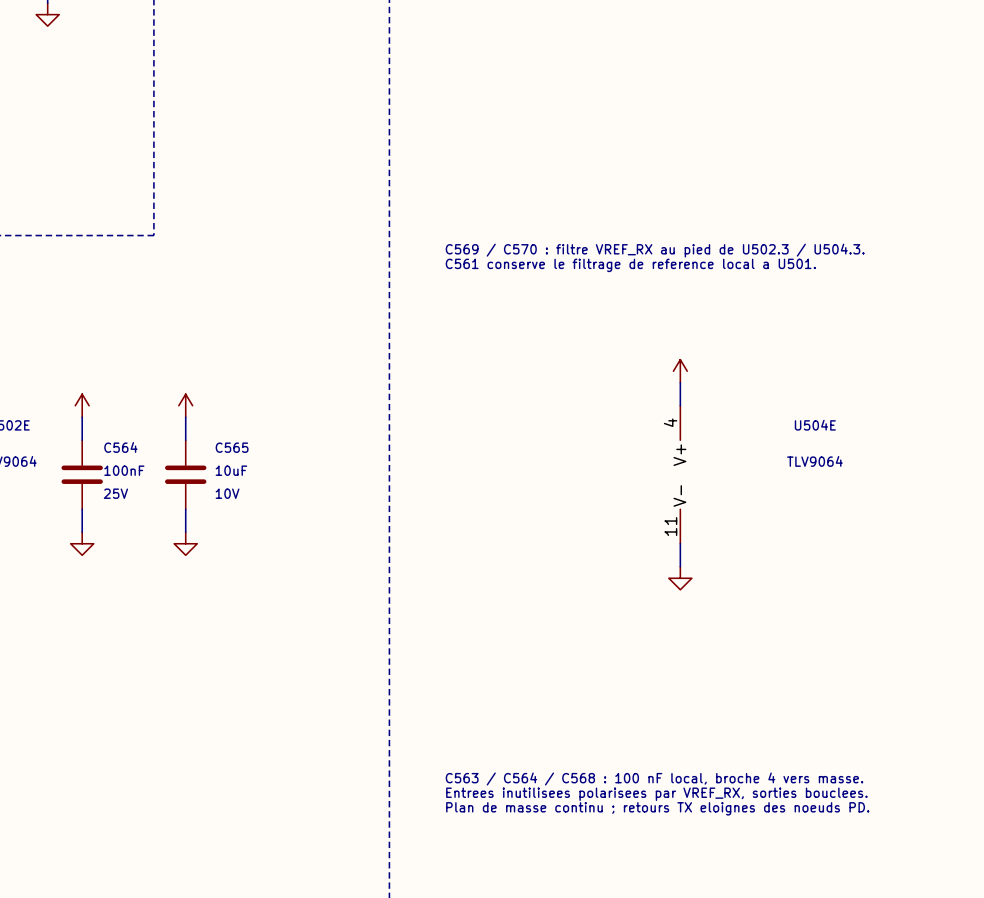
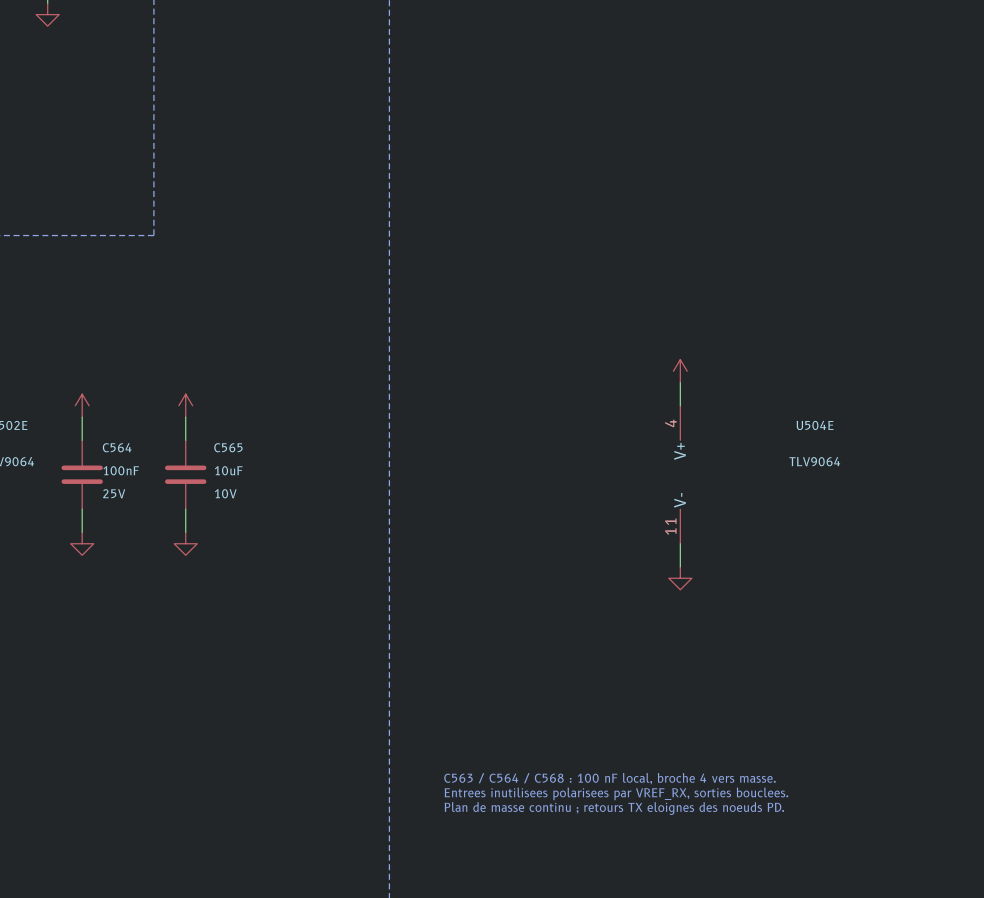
text: C569 / C570 : filtre VREF_RX au pied de U502.3 / U504.3. (655, 250) -> none
text: C561 conserve le filtrage de reference local a U501. (630, 265) -> none

